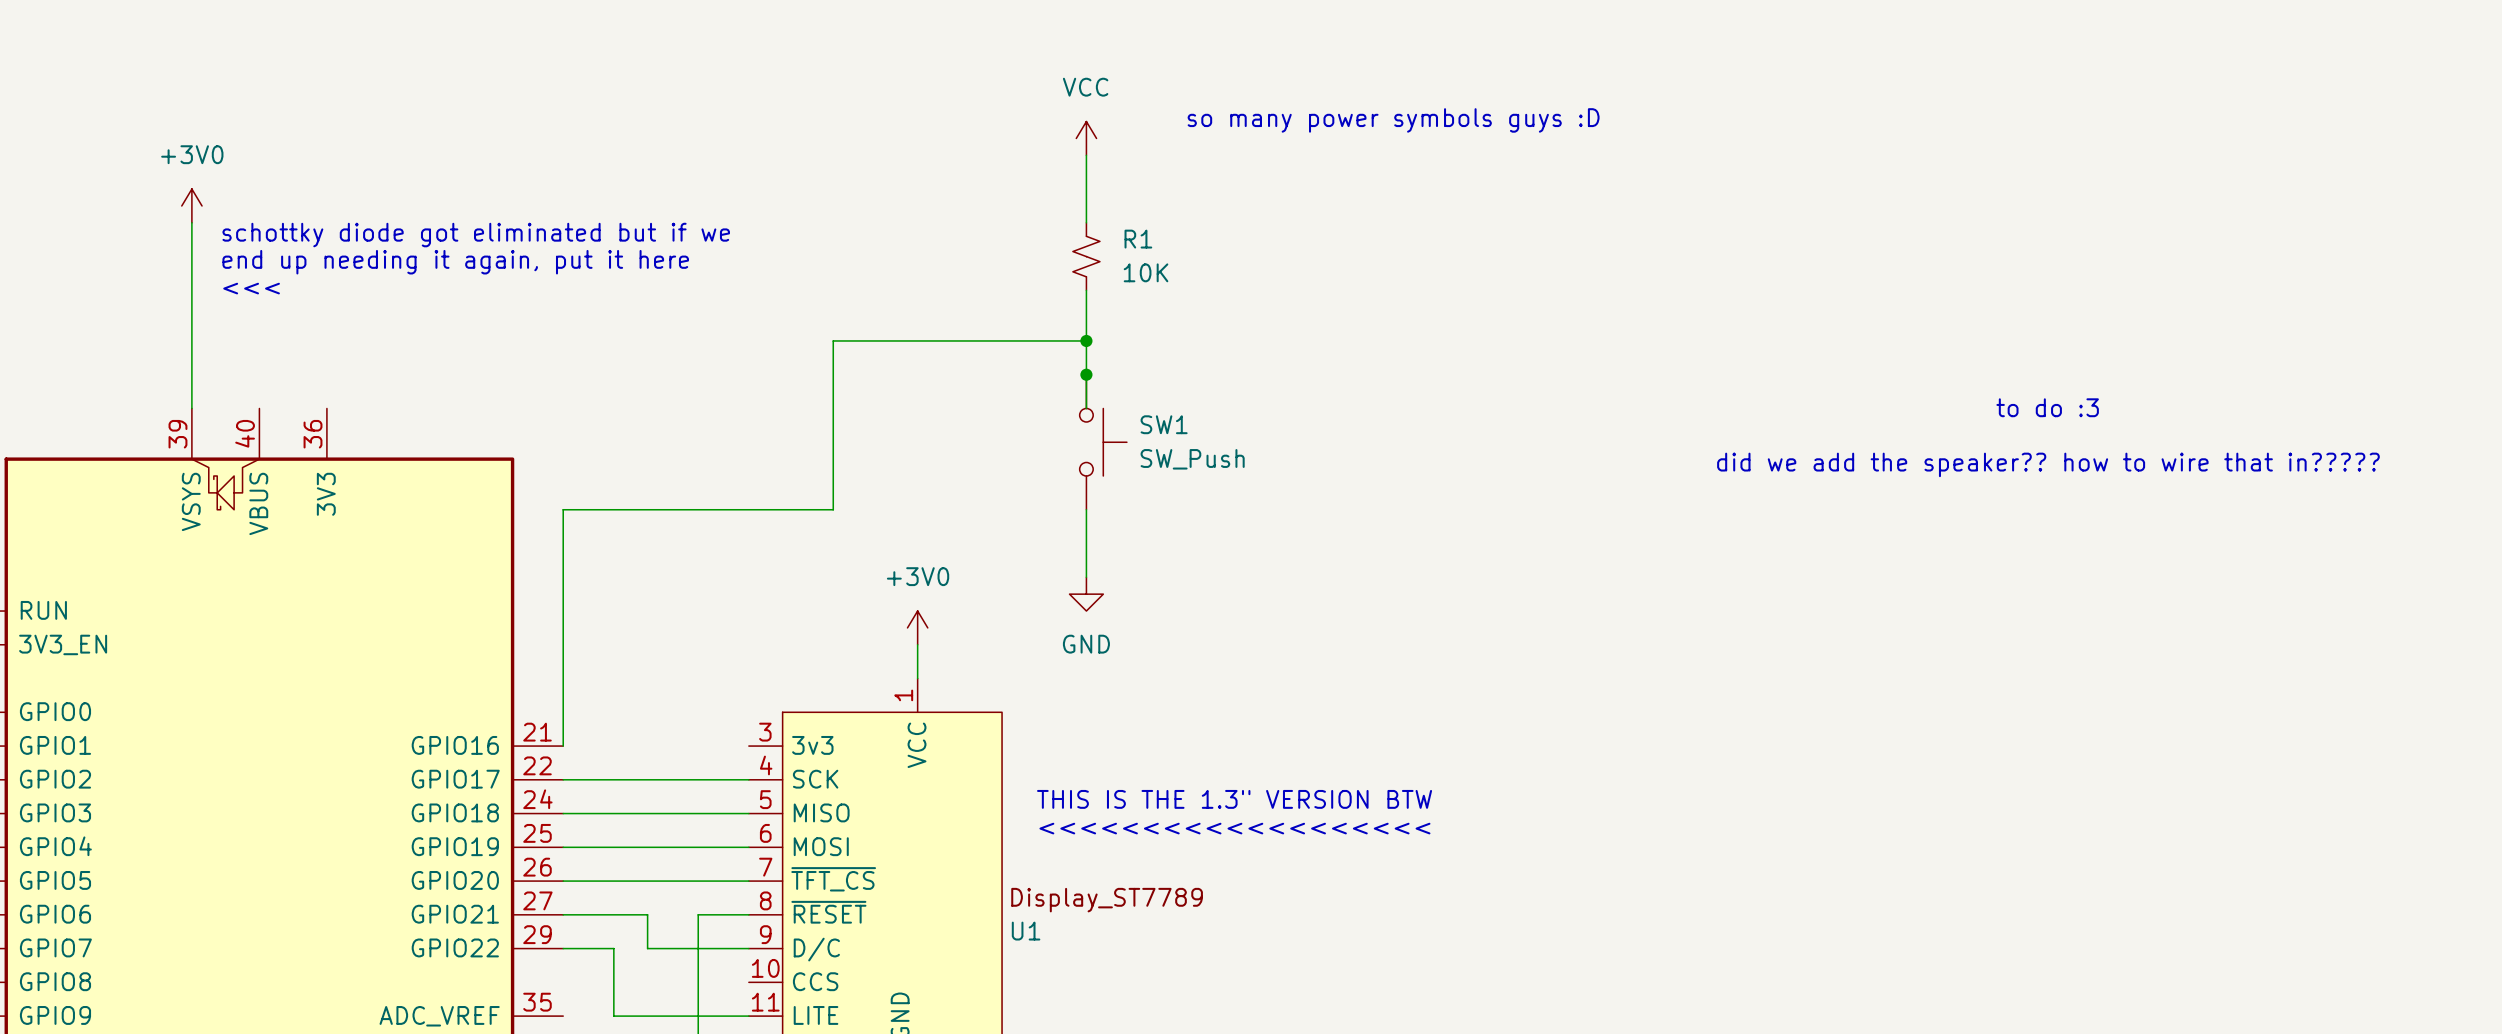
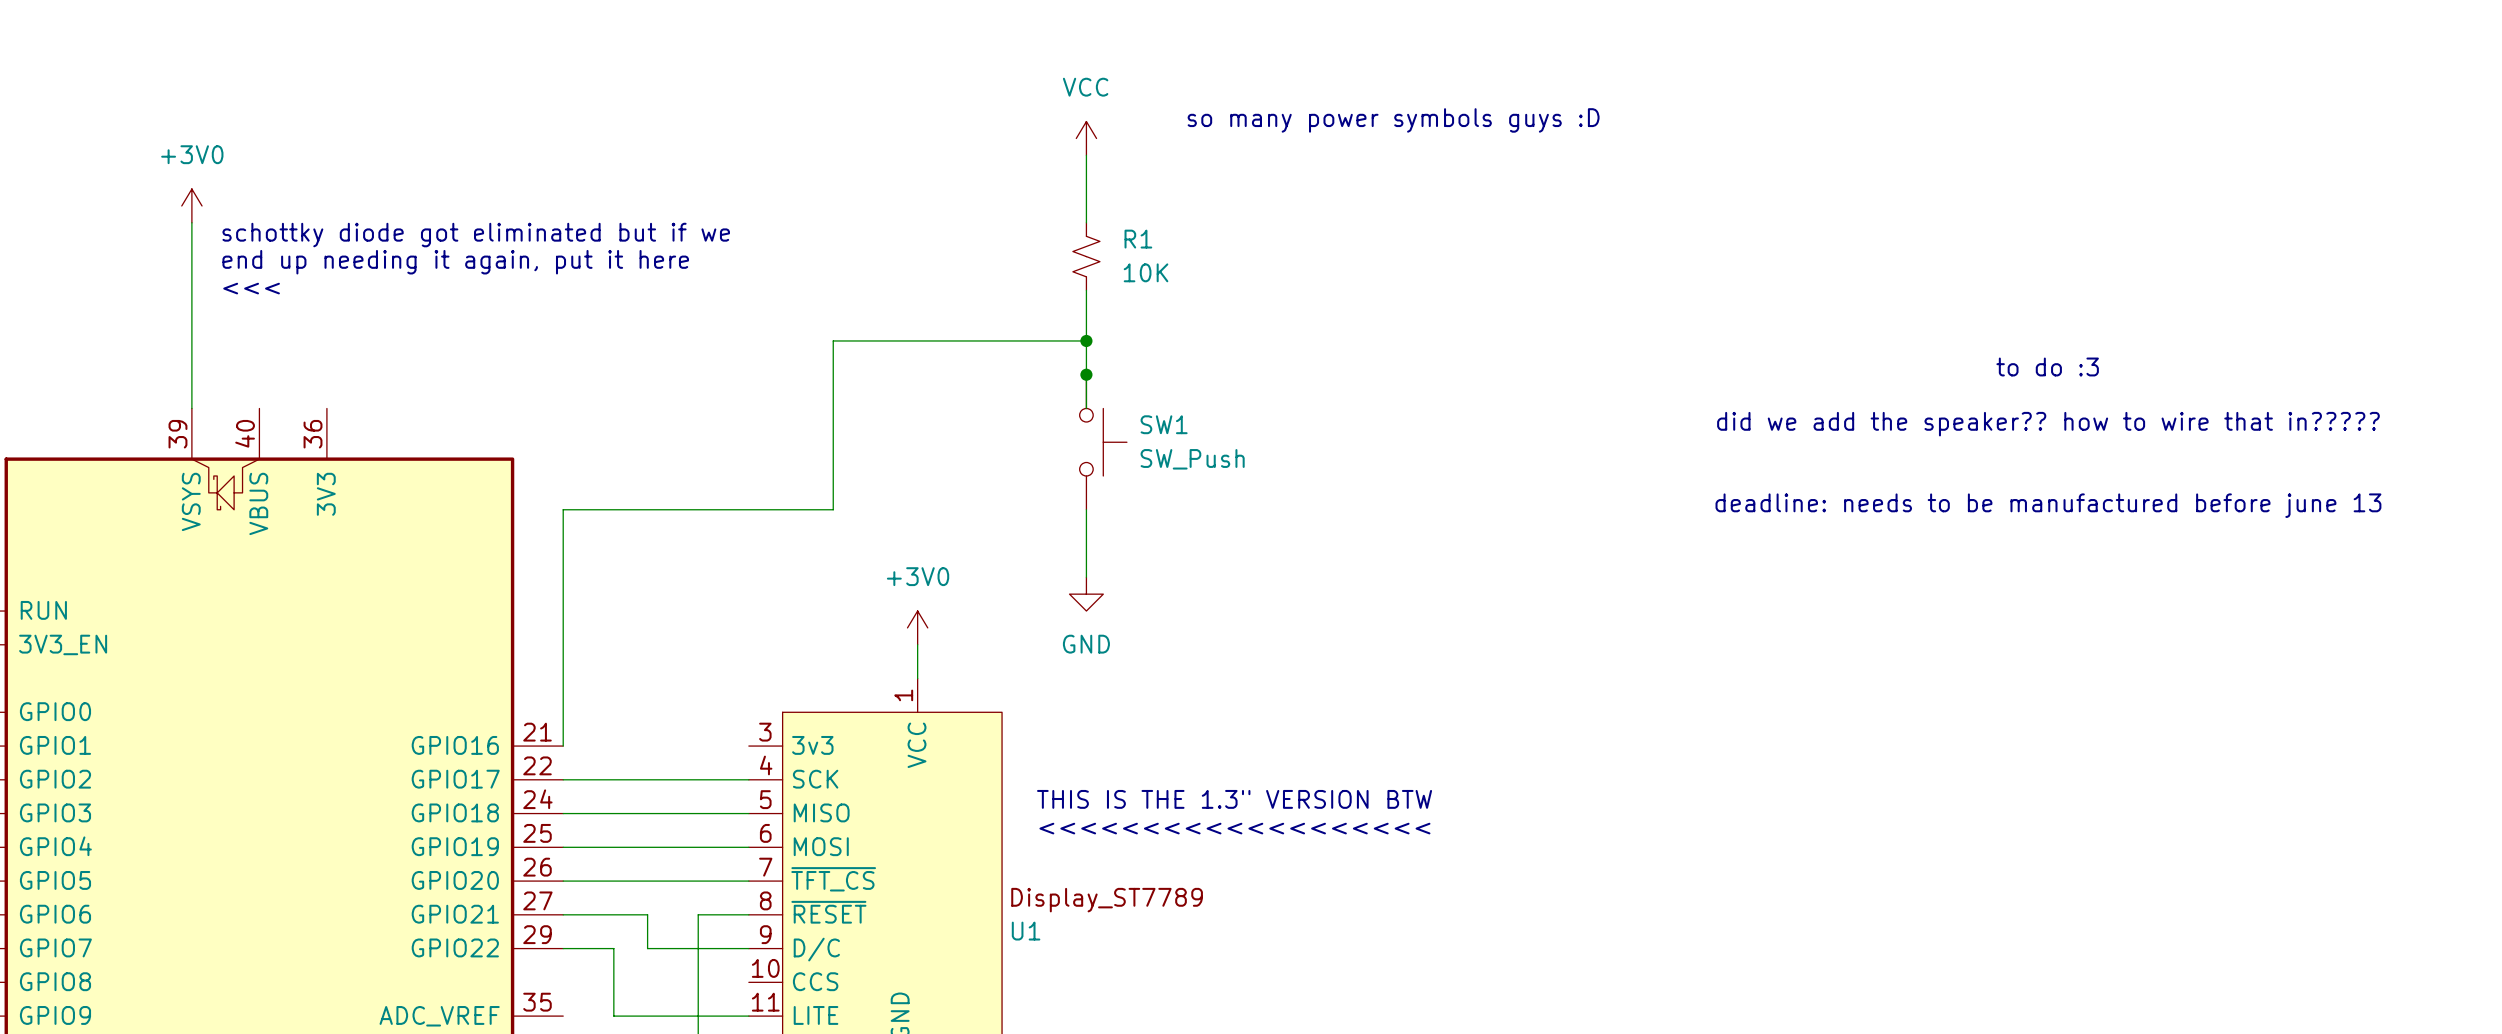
text position: to do :3 (2047, 407) -> to do :3 (2047, 366)
text position: did we add the speaker?? how to wire that in????? (2048, 464) -> did we add the speaker?? how to wire that in????? (2048, 424)
text: none -> deadline: needs to be manufactured before june 13 (2048, 505)

